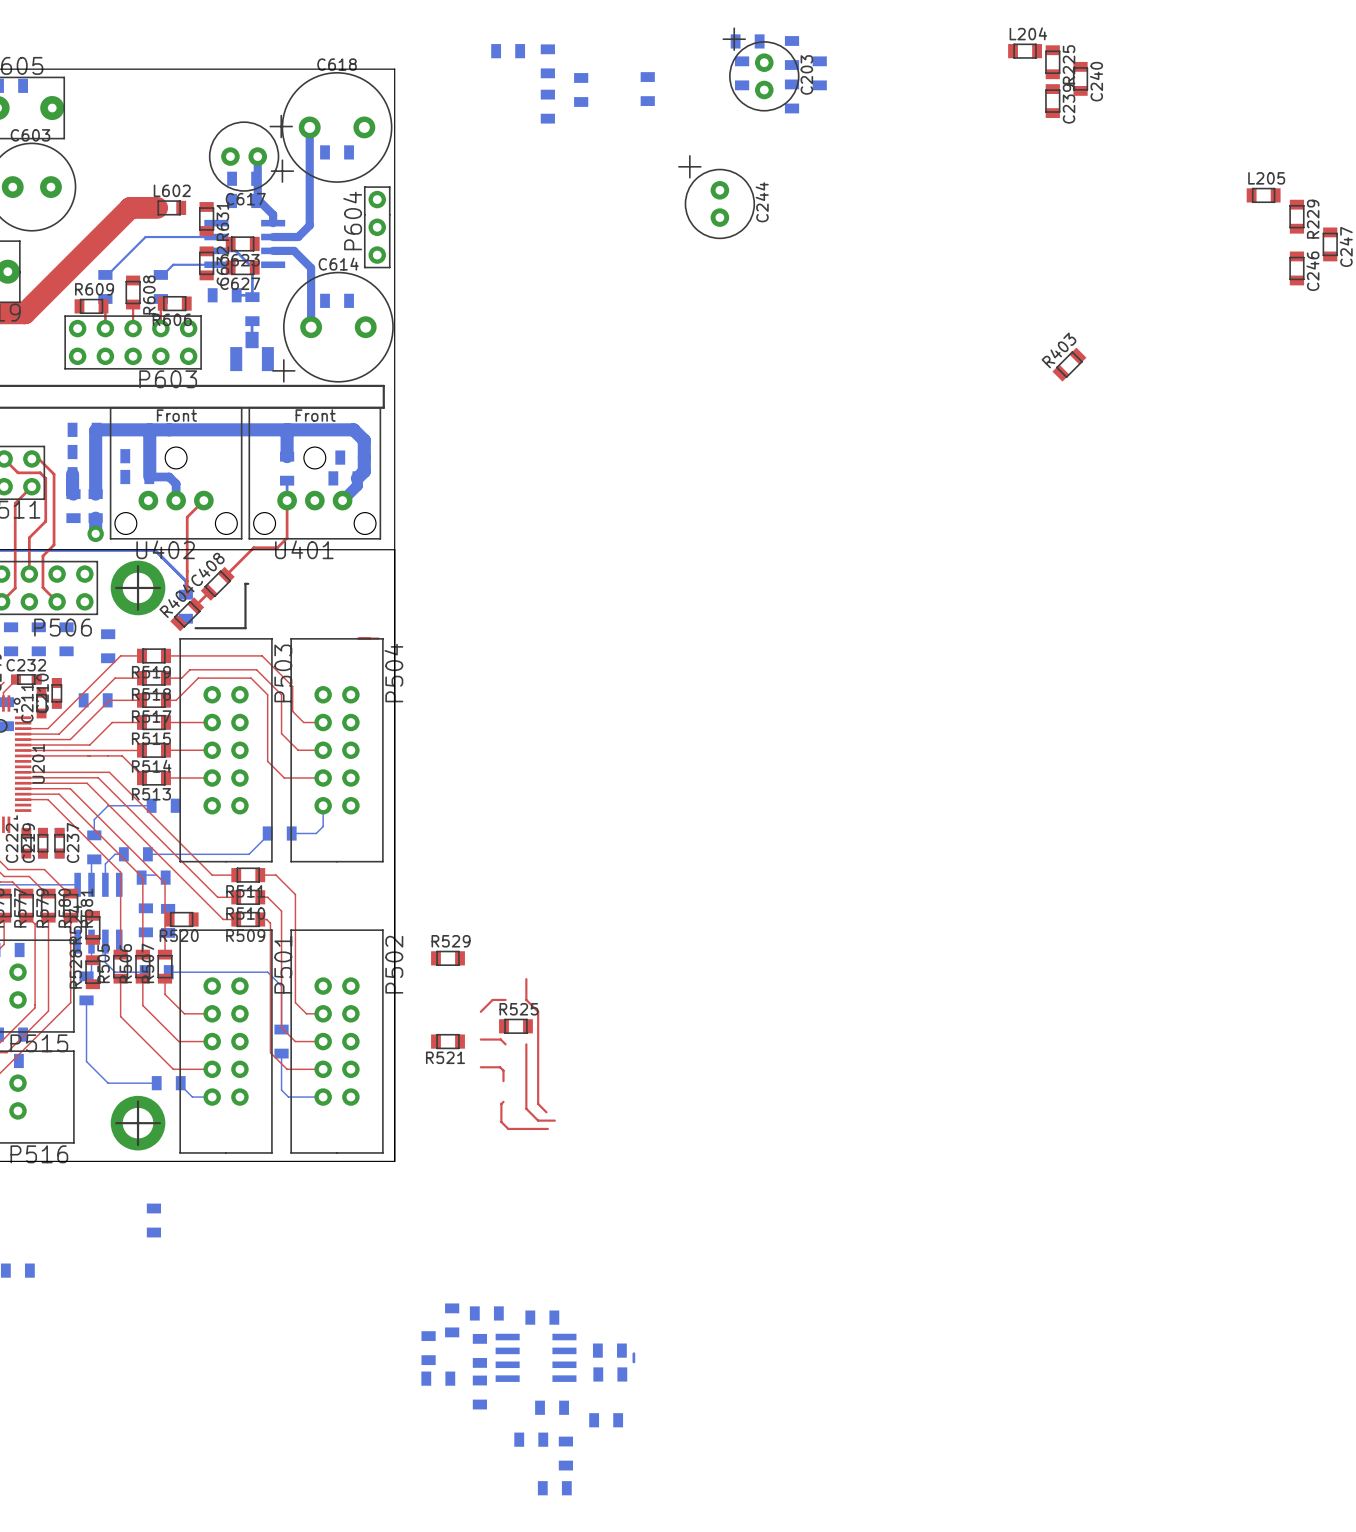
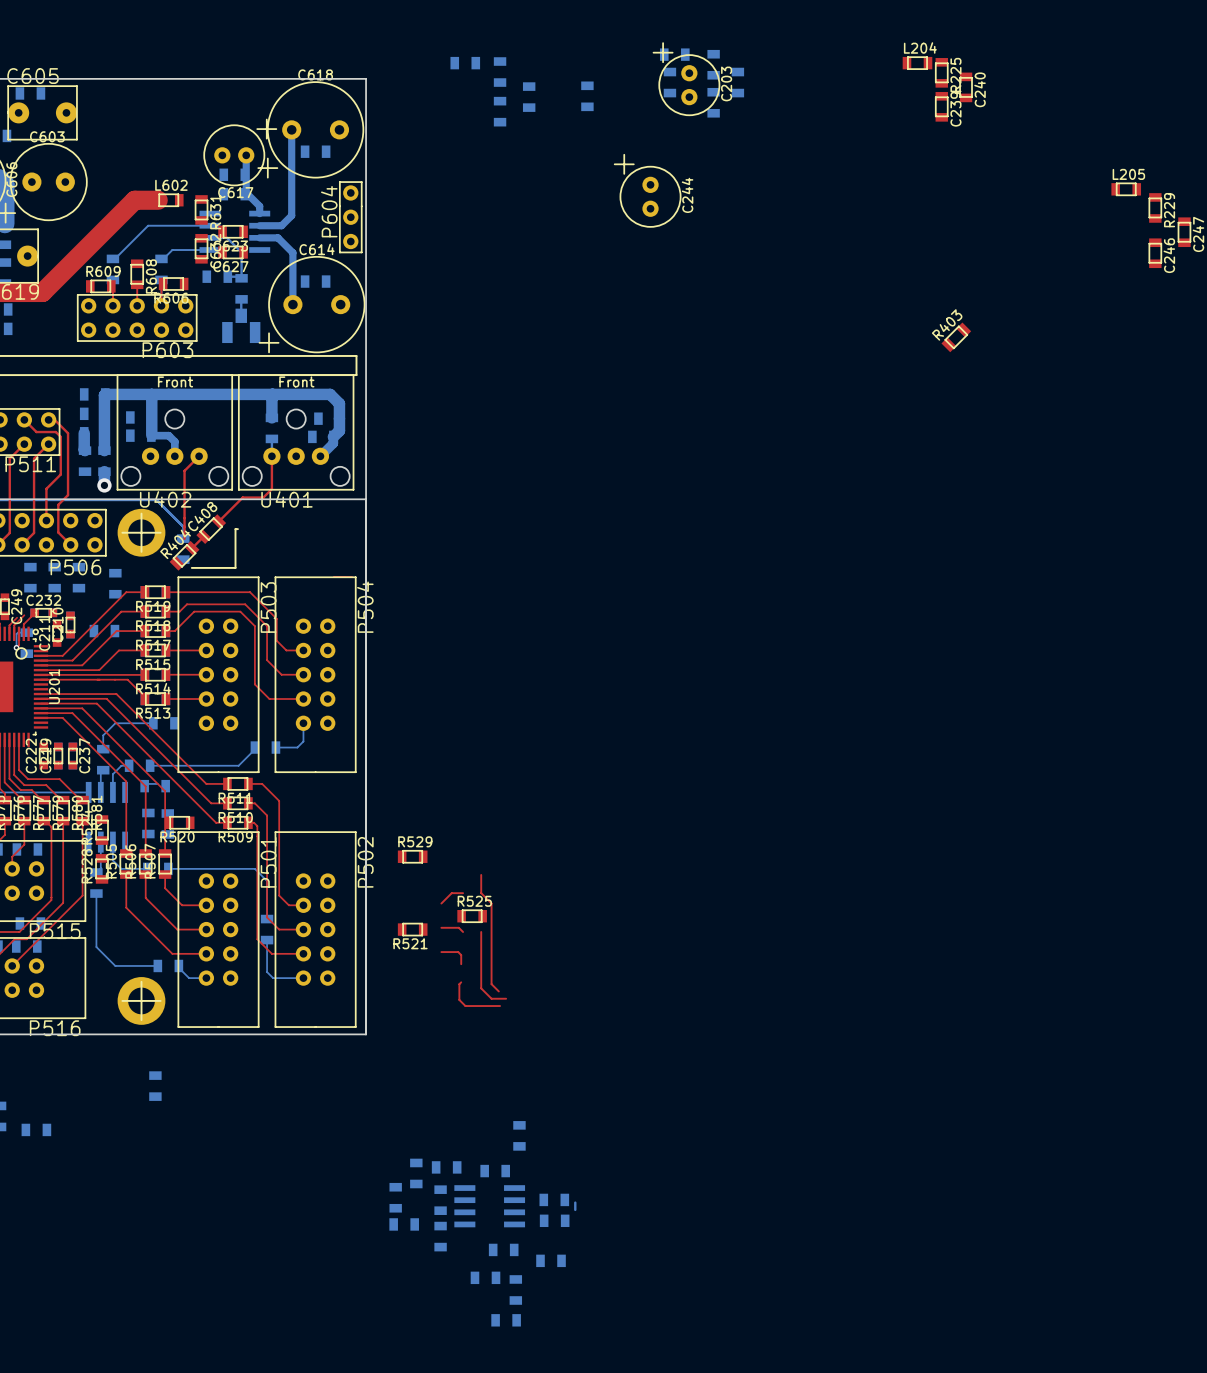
part: none -> (519, 1135)

